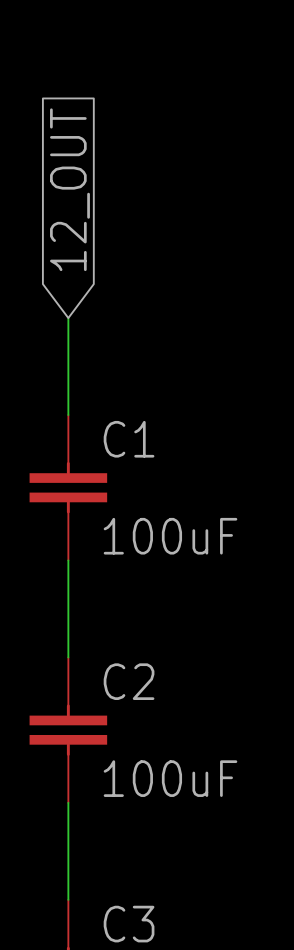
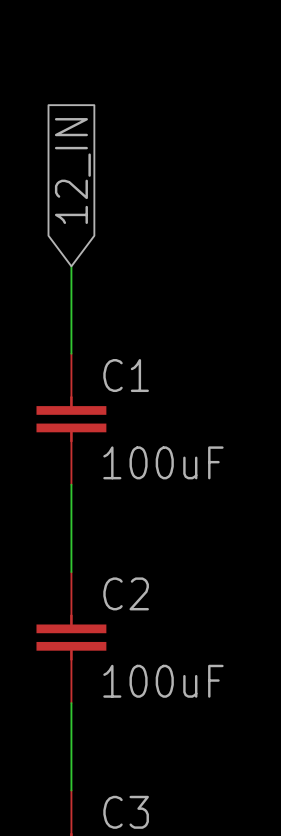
global label: 12_OUT (69, 189) -> 12_IN (72, 171)

